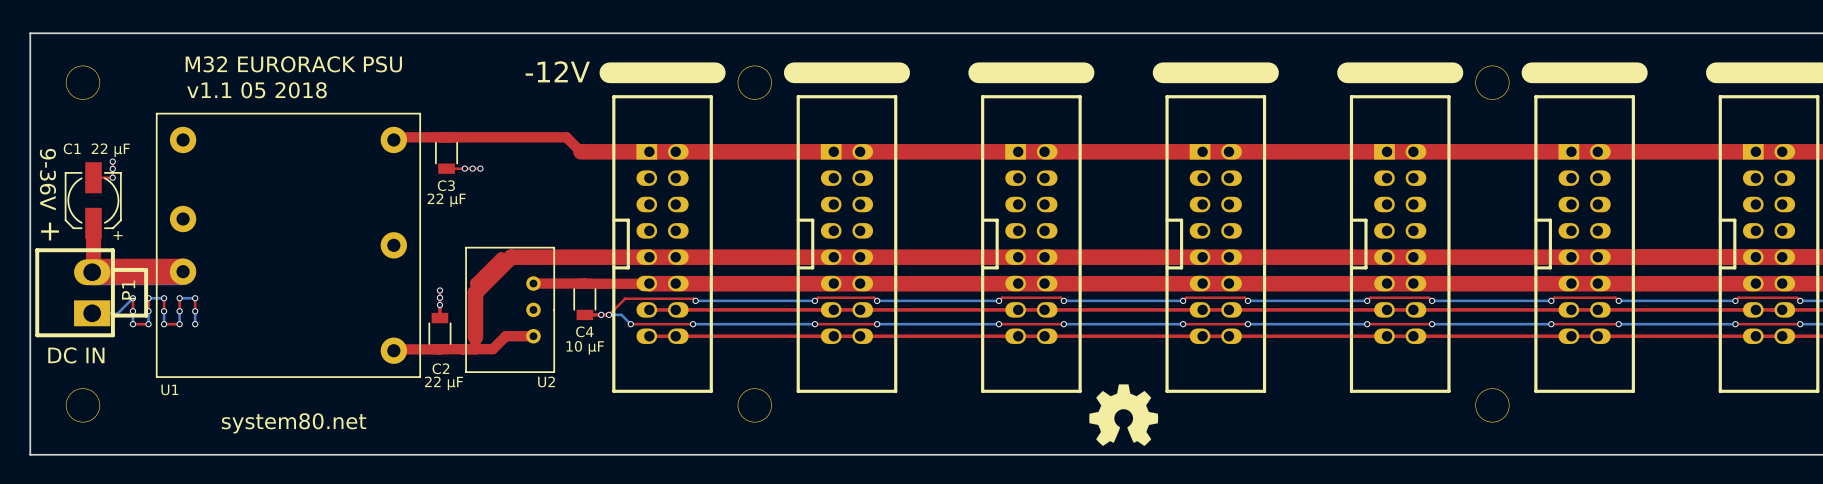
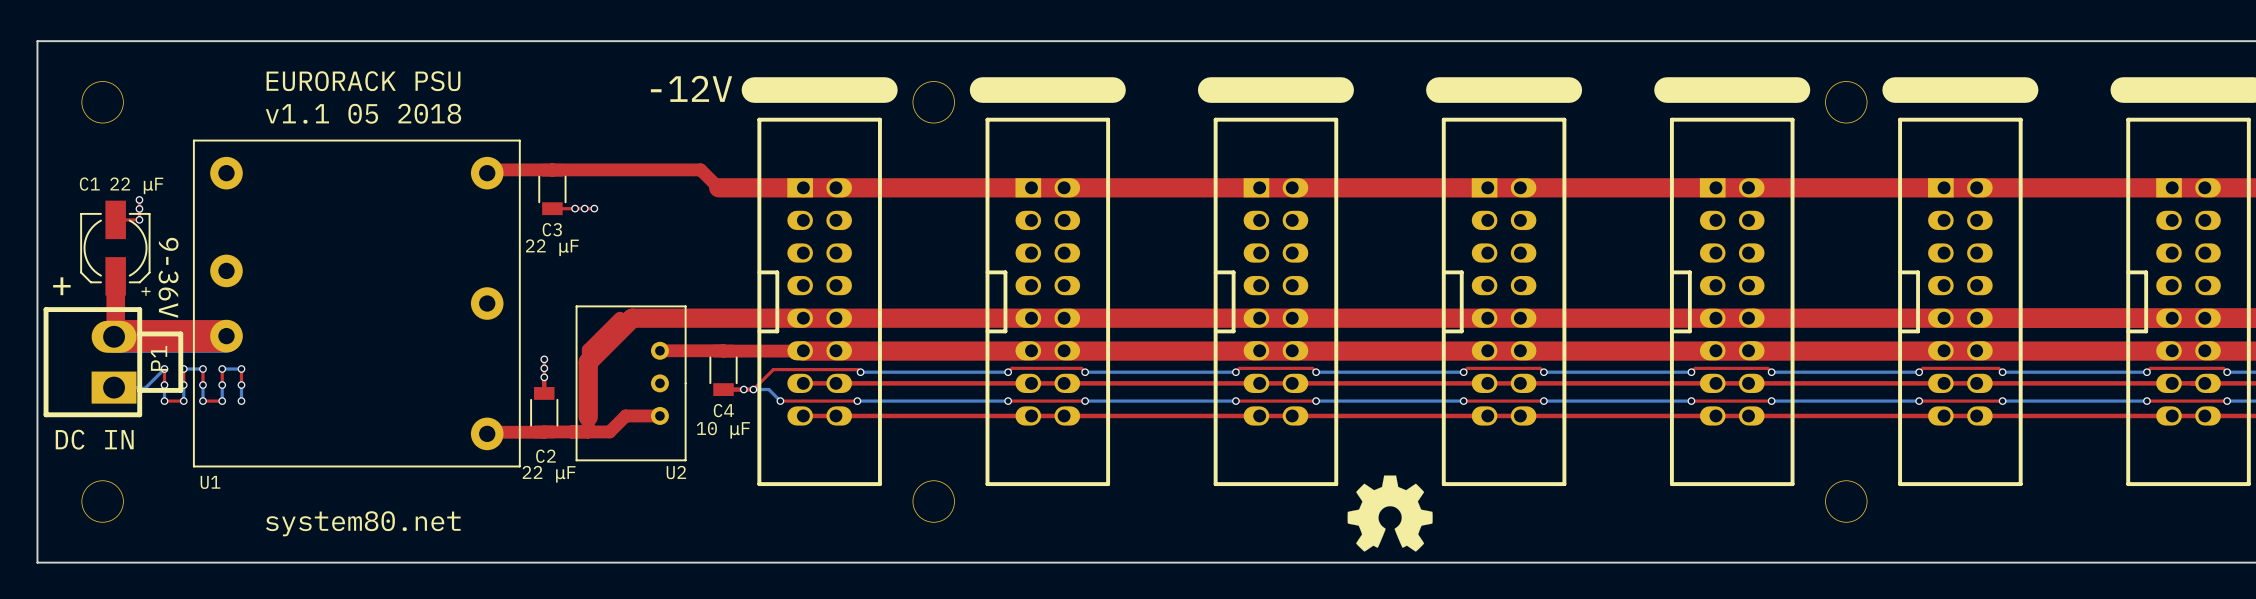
text: M32 EURORACK PSU (293, 64) -> EURORACK PSU (363, 81)
text position: v1.1 05 2018 (257, 90) -> v1.1 05 2018 (363, 113)
text position: 9-36V (47, 179) -> 9-36V (168, 277)

